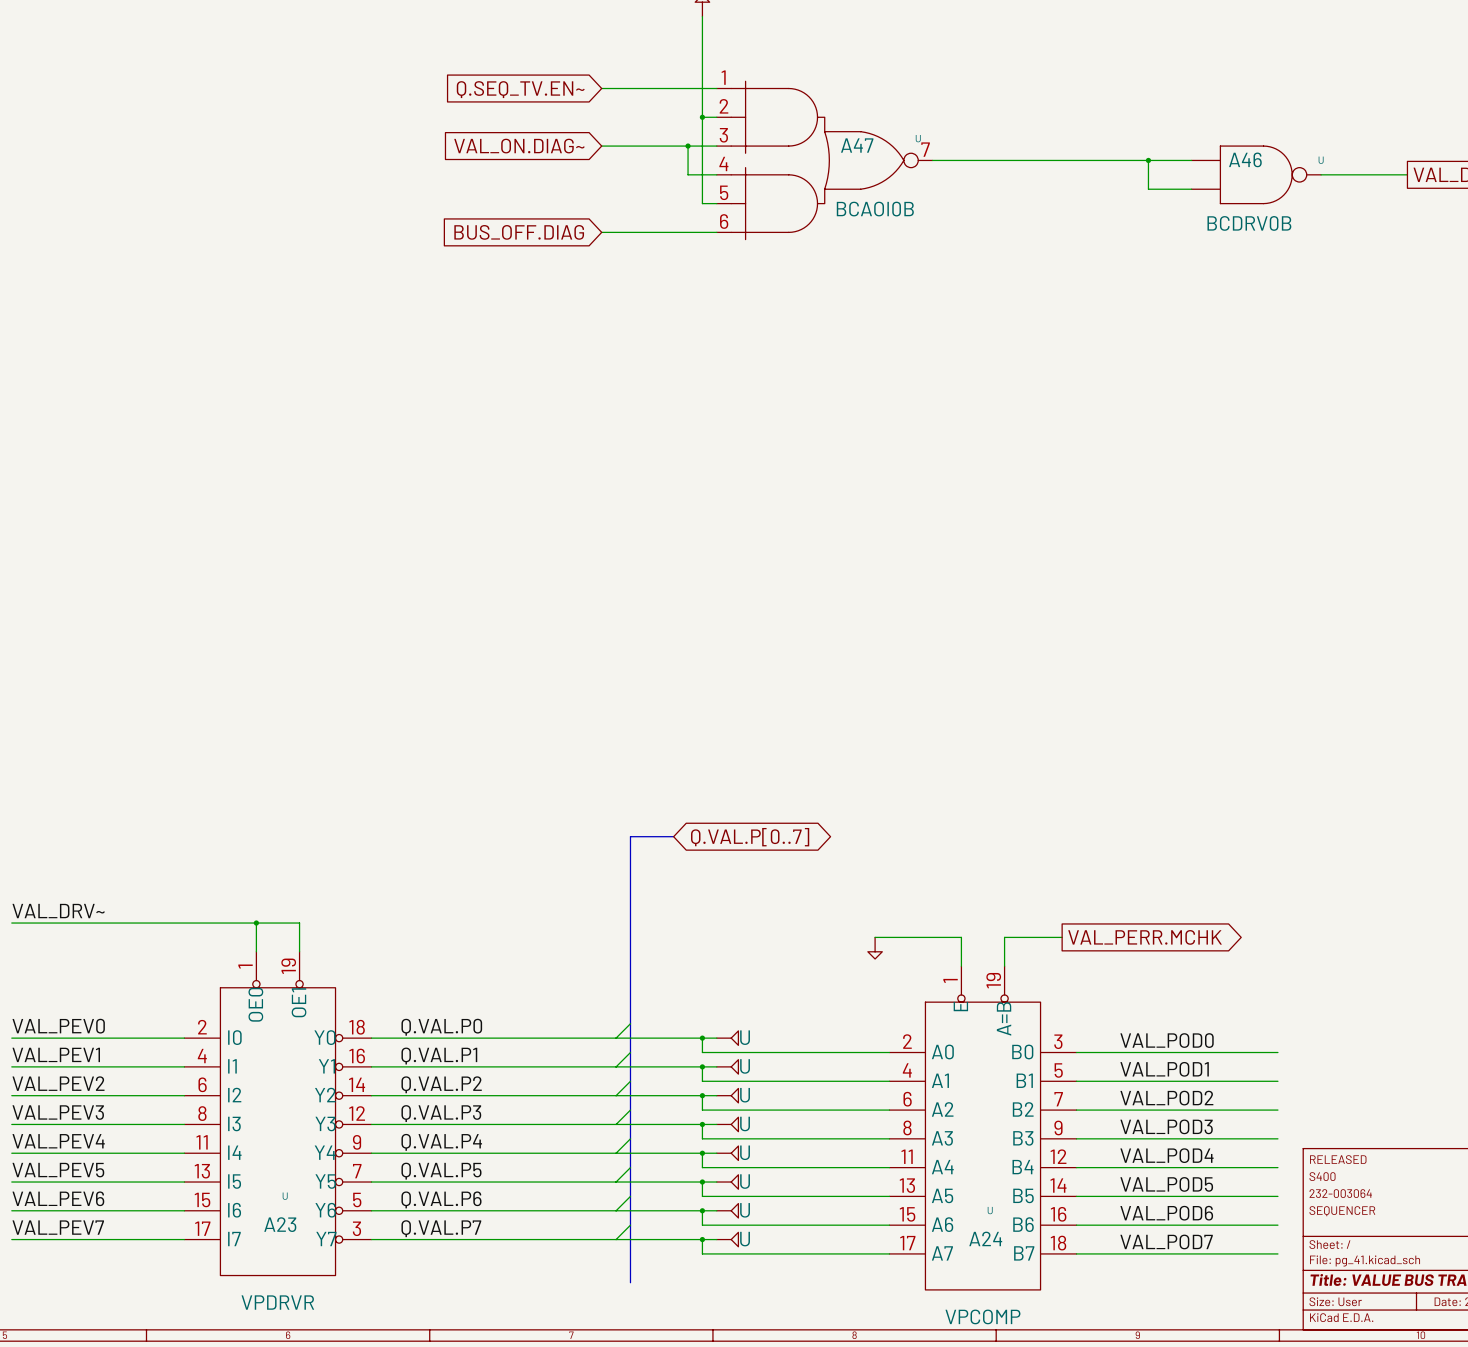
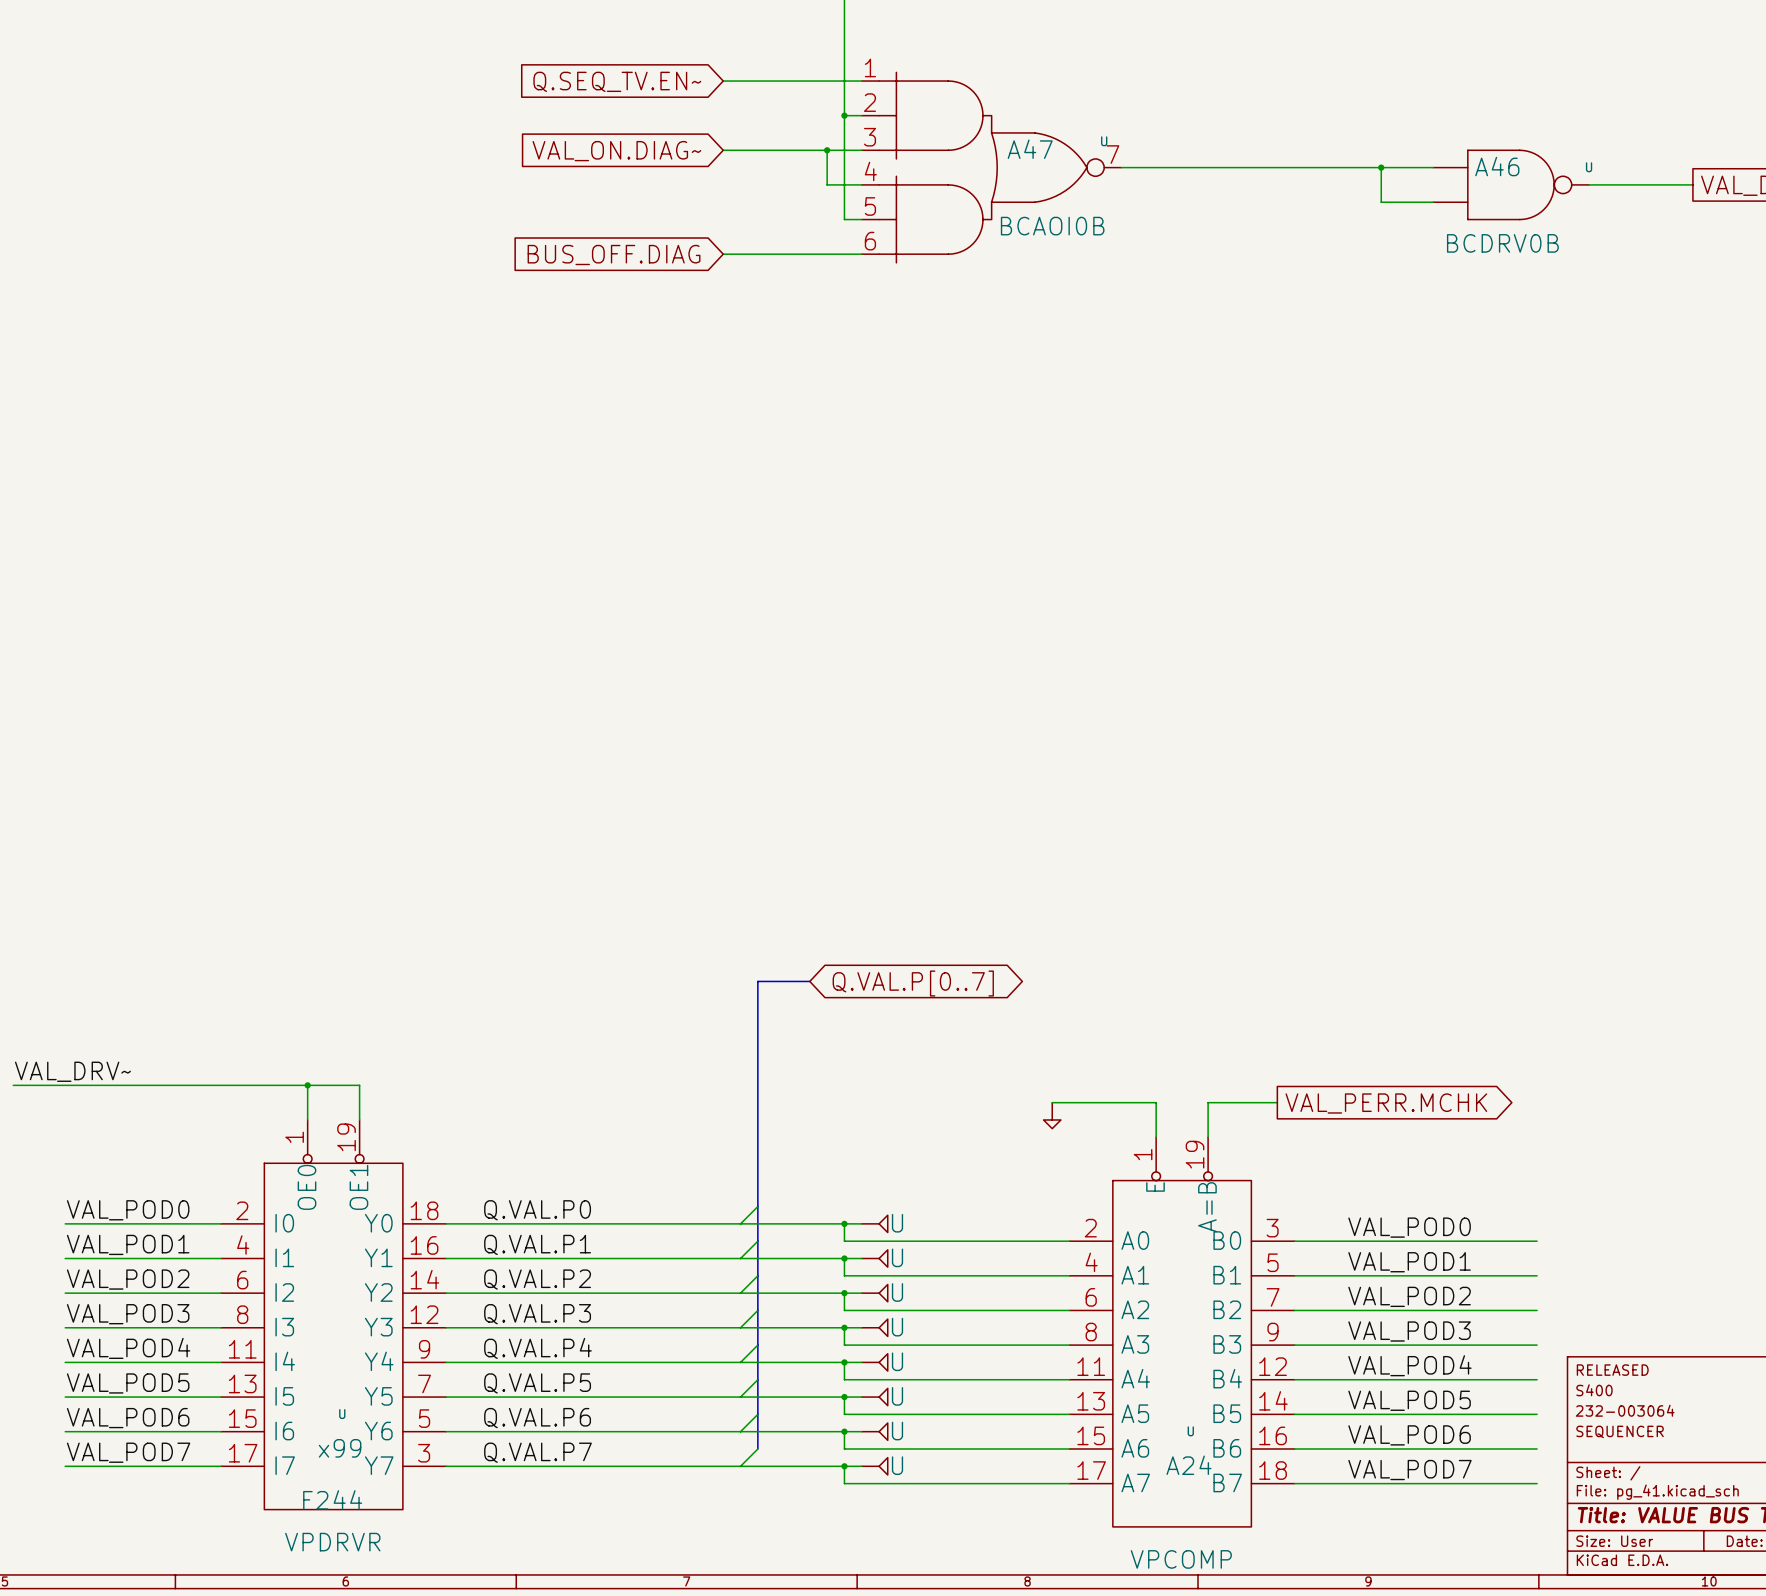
U symbol: [184, 951, 372, 1276] -> [221, 1119, 447, 1510]
label: VAL_PEV0 (58, 1026) -> none
label: none -> VAL_POD0 (128, 1210)
wire: (11, 1038) (54, 1038) -> none
label: VAL_PEV1 (56, 1054) -> none
label: none -> VAL_POD1 (128, 1244)
wire: (11, 1066) (54, 1066) -> none
label: VAL_PEV2 (58, 1083) -> none
label: none -> VAL_POD2 (128, 1279)
wire: (11, 1095) (54, 1095) -> none
label: VAL_PEV3 (58, 1112) -> none
label: none -> VAL_POD3 (128, 1314)
wire: (11, 1124) (54, 1124) -> none
label: VAL_PEV4 (58, 1141) -> none
label: none -> VAL_POD4 (128, 1348)
wire: (11, 1153) (54, 1153) -> none
label: VAL_PEV5 (58, 1170) -> none
label: none -> VAL_POD5 (128, 1383)
wire: (11, 1182) (54, 1182) -> none
label: VAL_PEV6 (58, 1198) -> none
label: none -> VAL_POD6 (128, 1418)
wire: (11, 1210) (54, 1210) -> none
U text: A23 (280, 1224) -> x99 (340, 1448)
bus: (630, 1225) (630, 1282) -> none
label: VAL_PEV7 (58, 1227) -> none
label: none -> VAL_POD7 (128, 1452)
wire: (11, 1239) (54, 1239) -> none
U value: none -> F244 (332, 1499)

